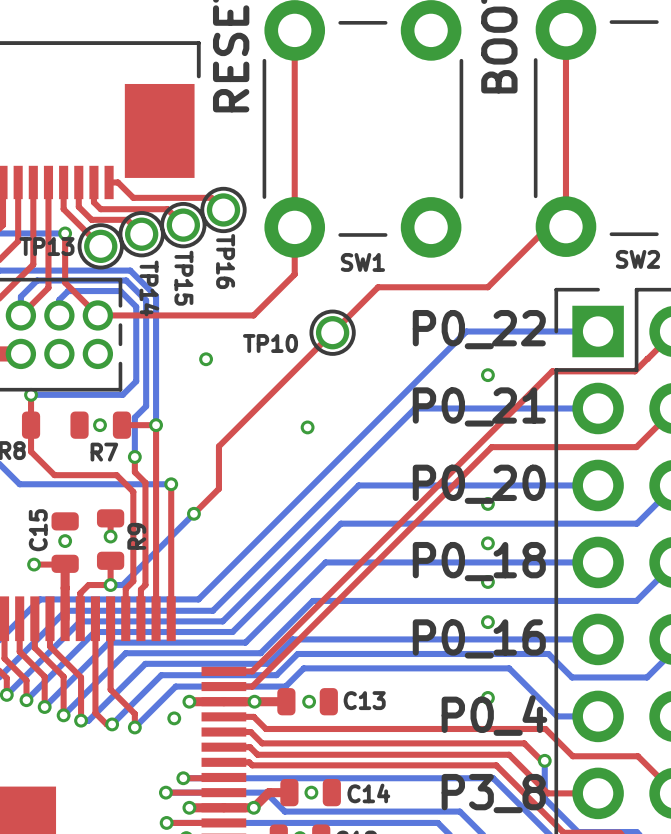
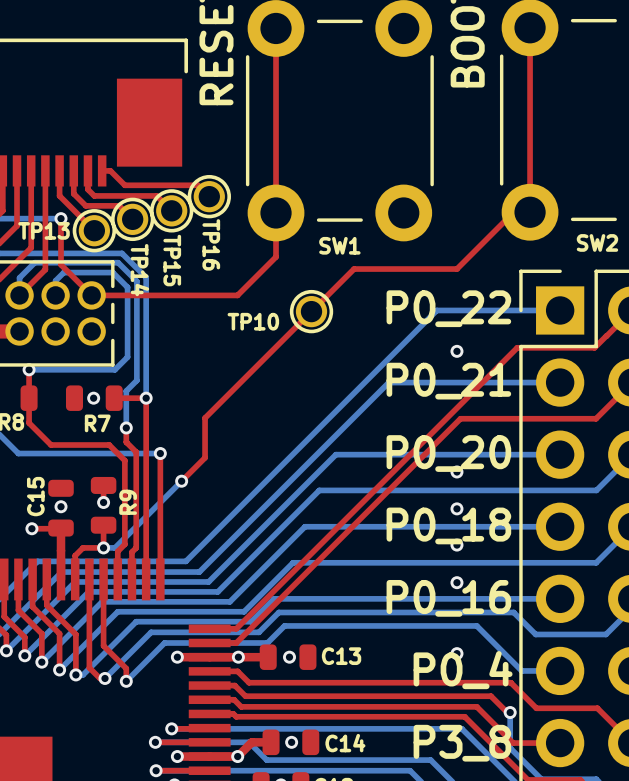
via: (206, 359) -> none
via: (307, 427) -> none
via: (174, 718) -> none

